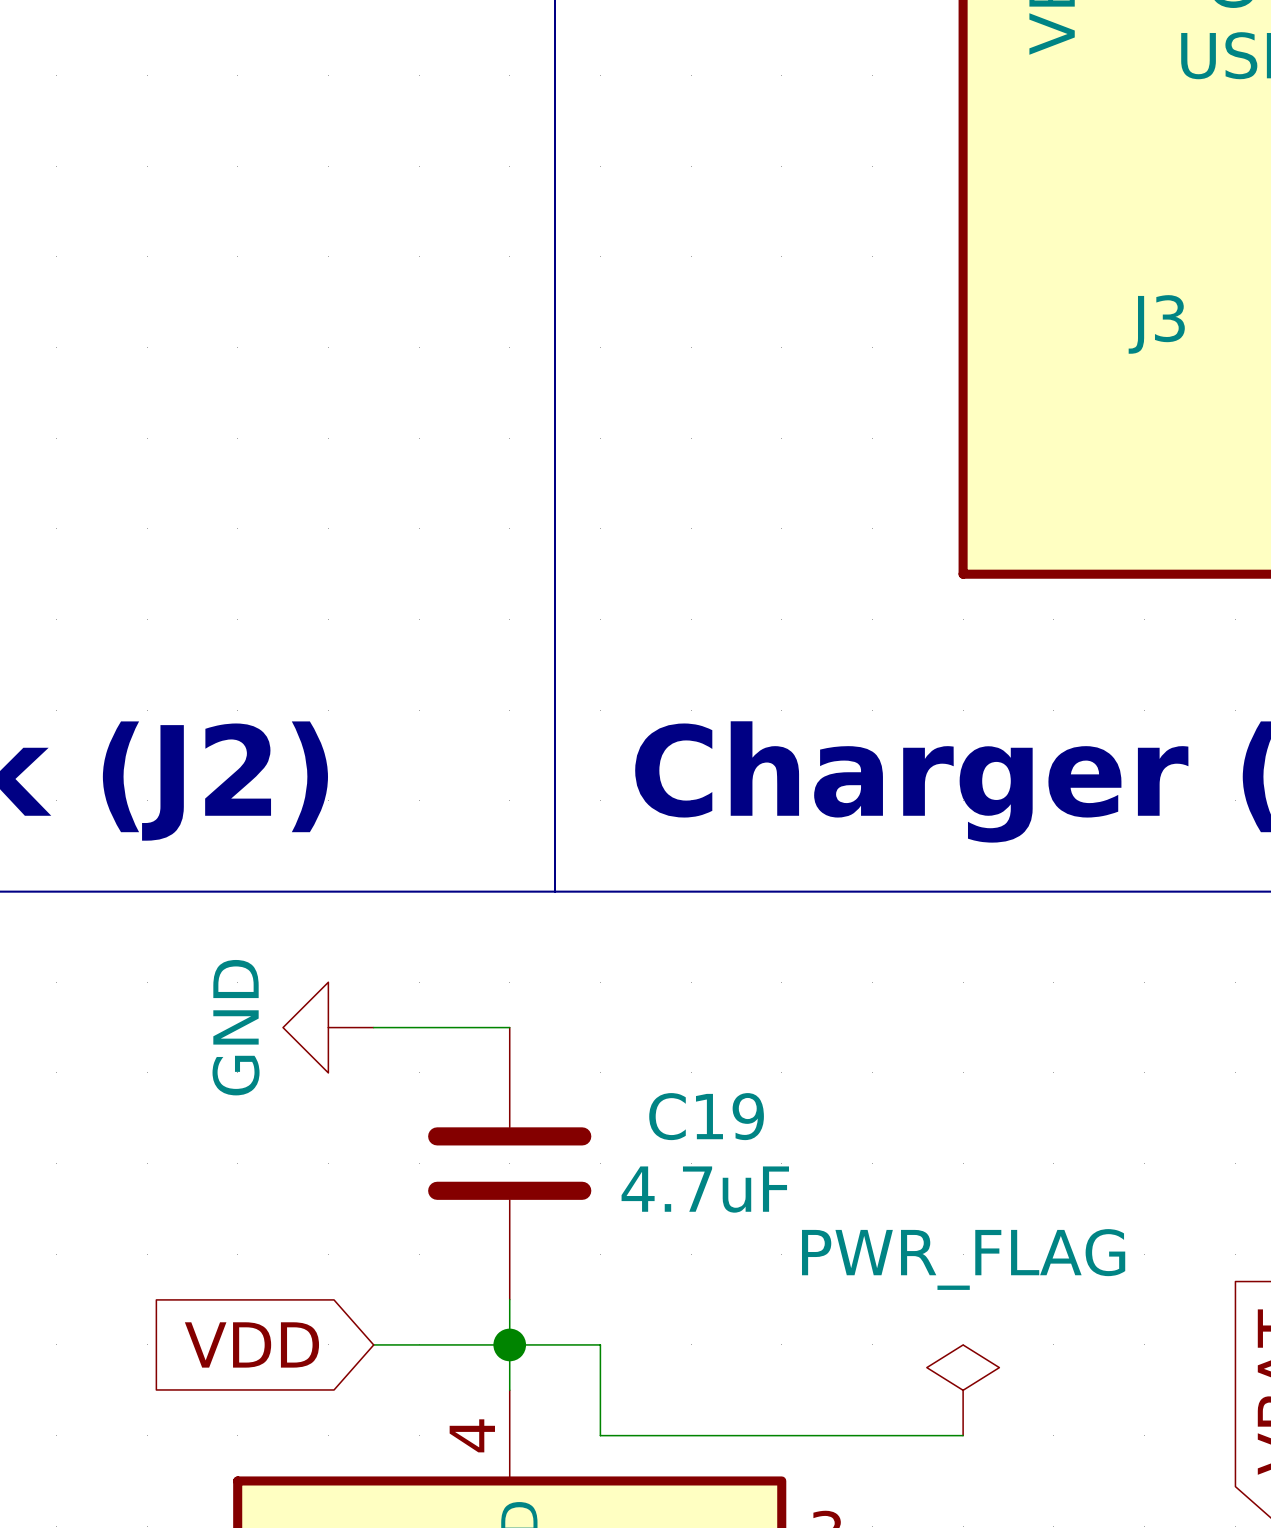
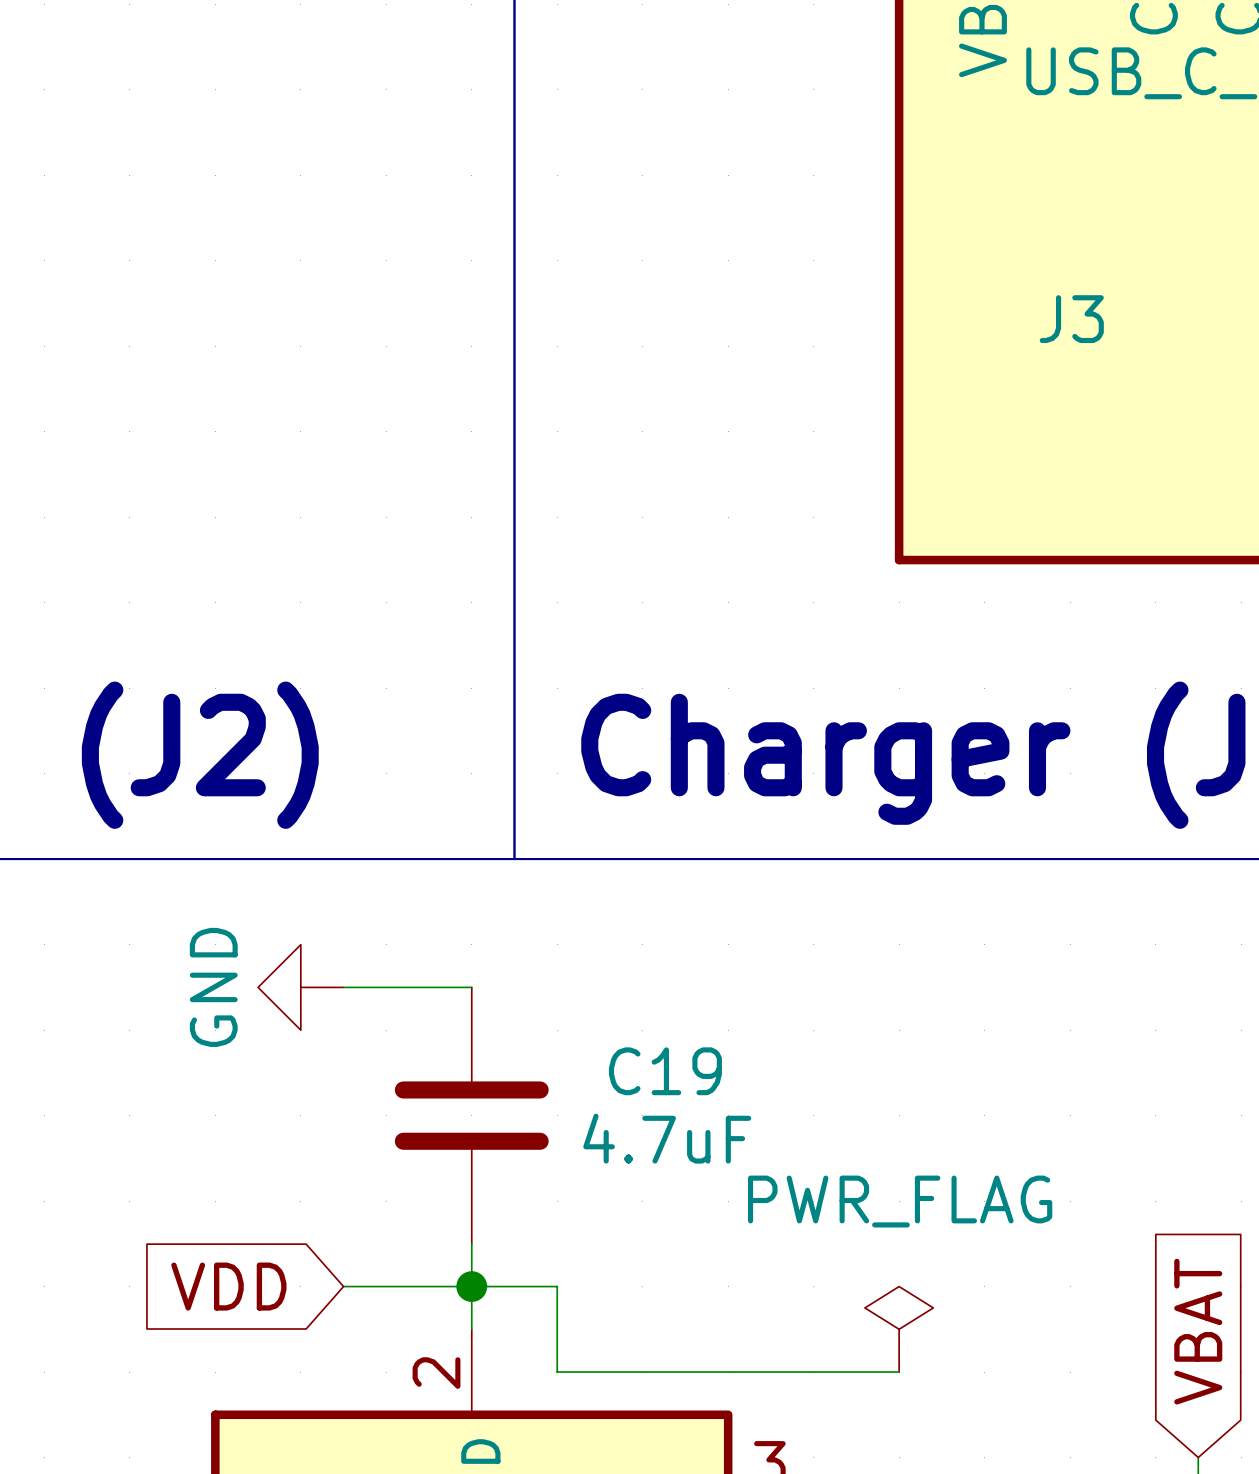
part pin number: 4 (472, 1435) -> 2 (436, 1373)

